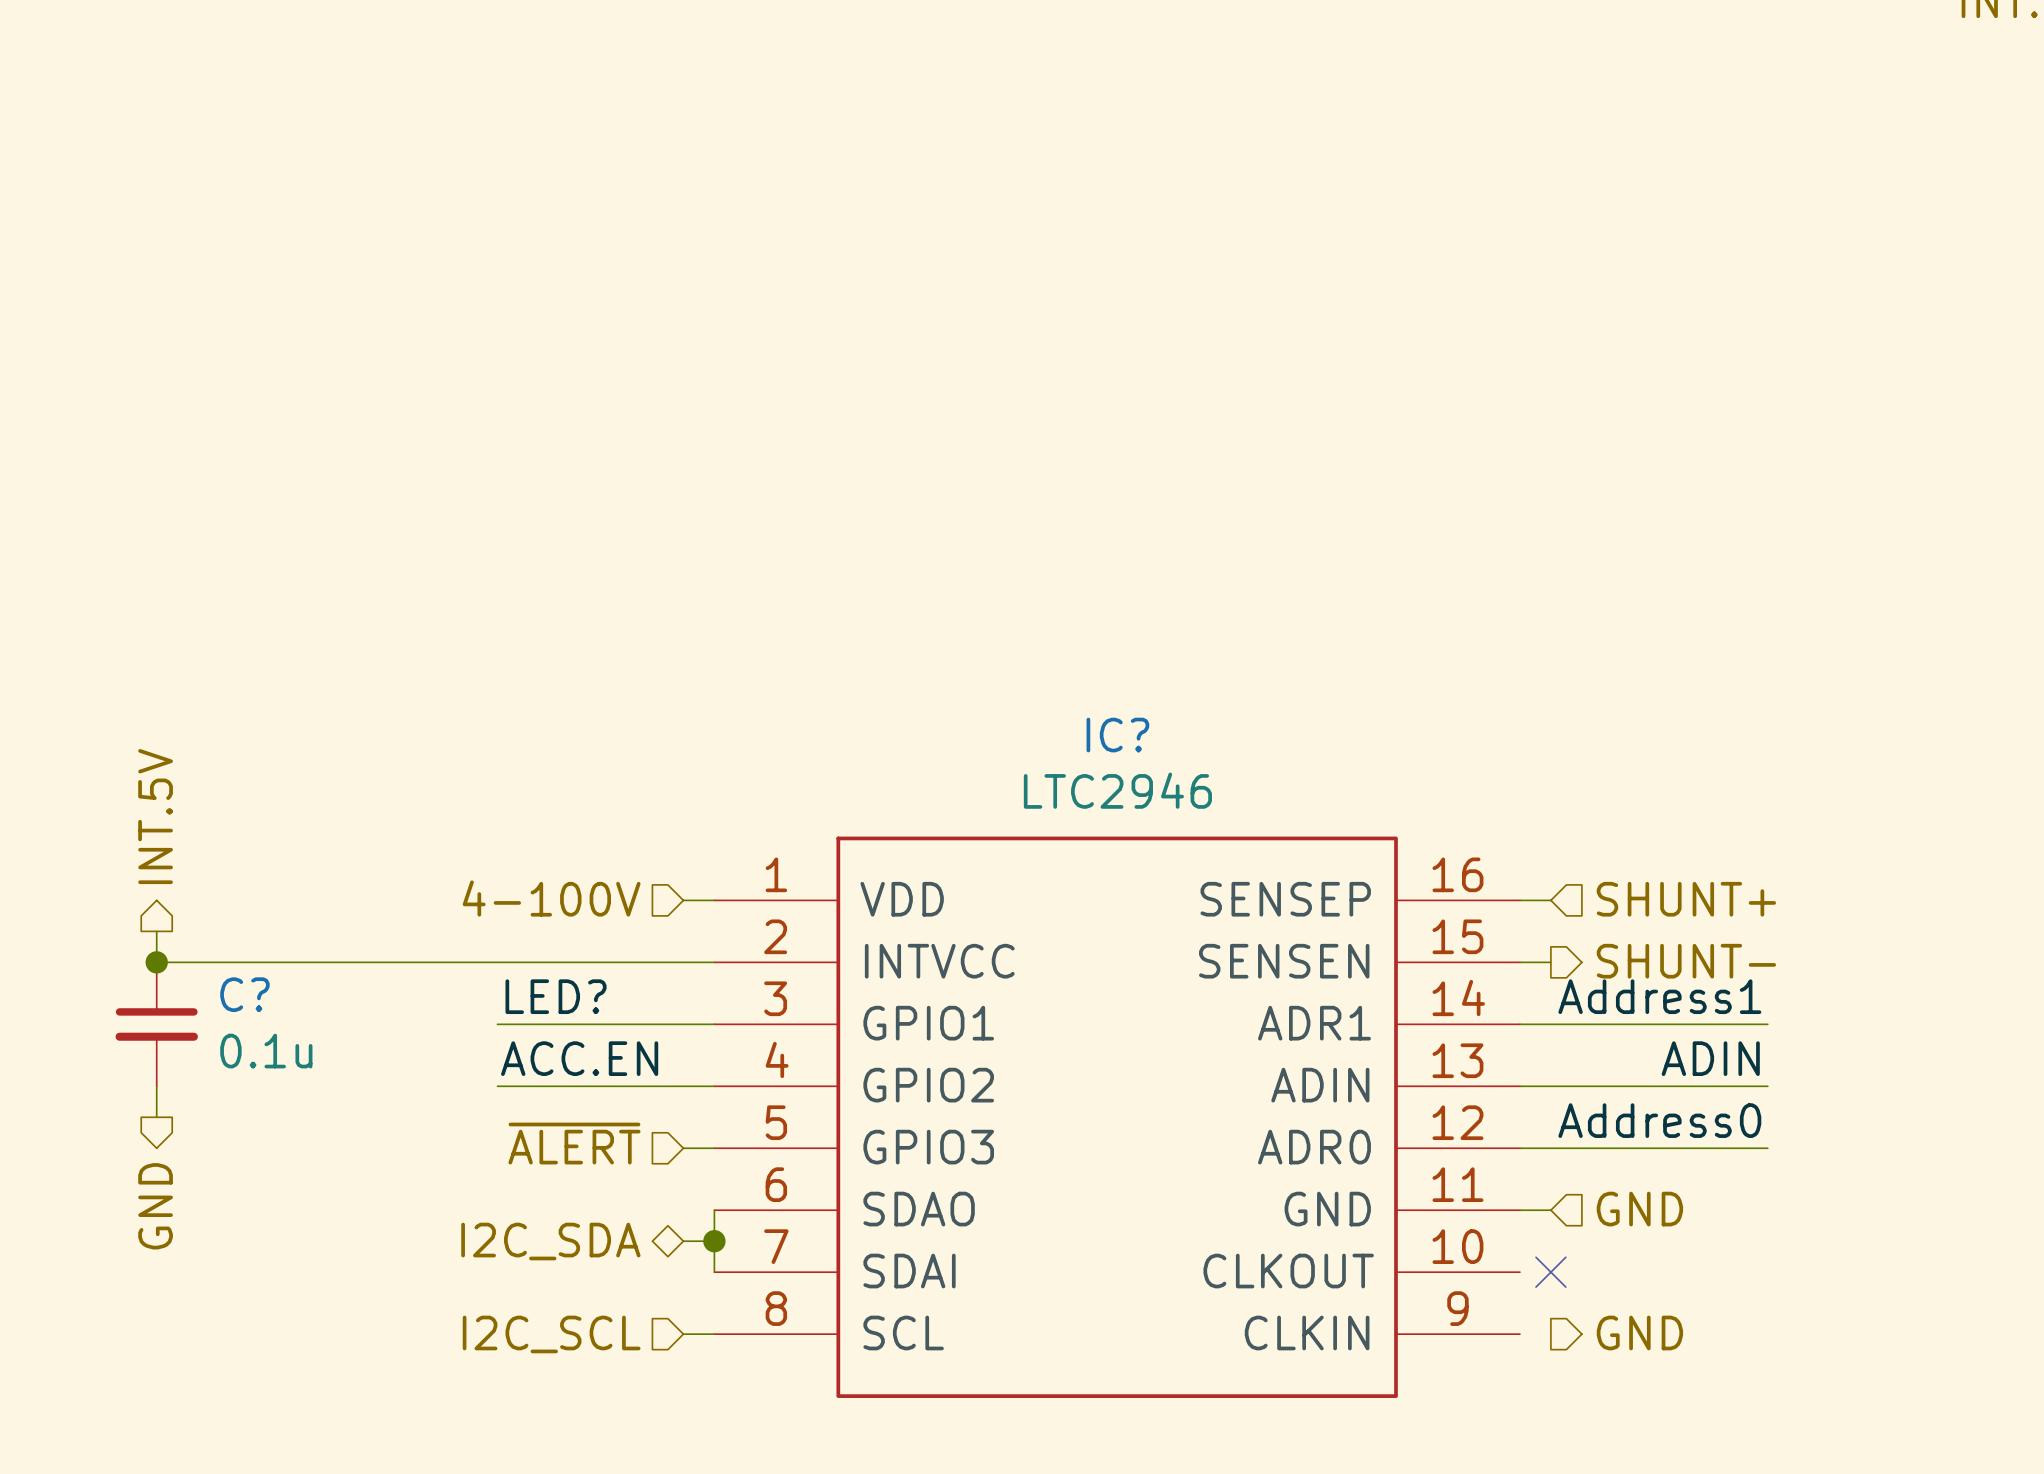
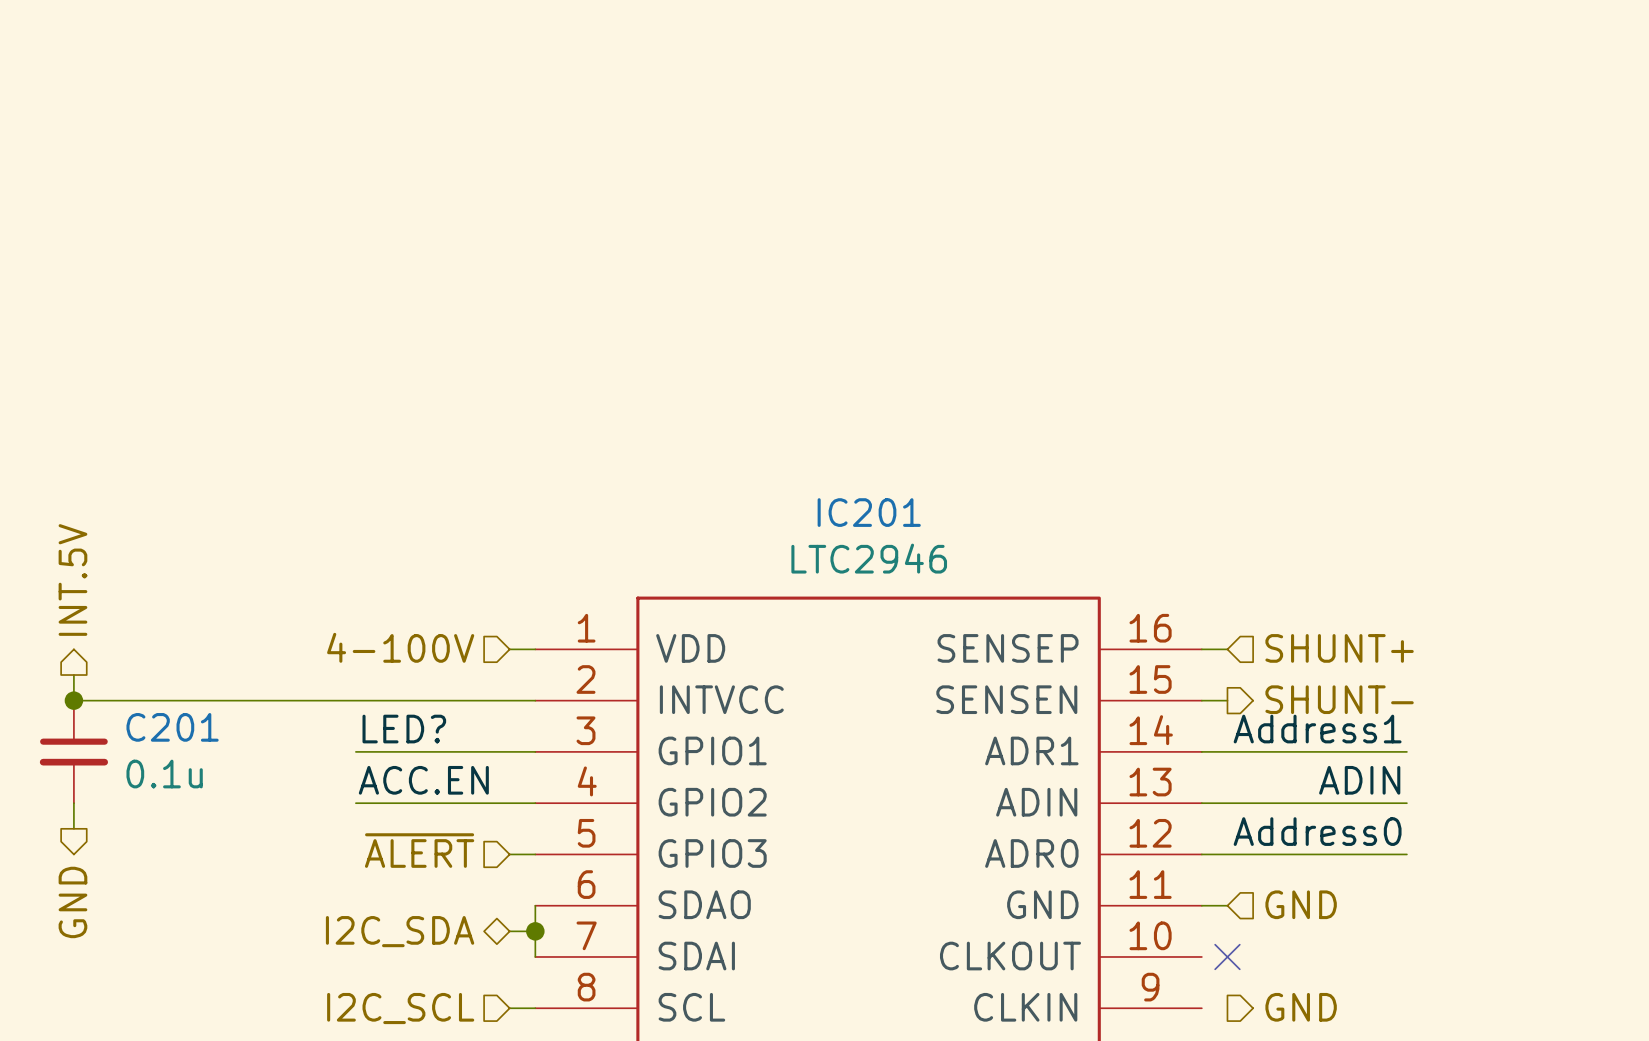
IC? name: IC? (1117, 735) -> IC201 (869, 512)
C? name: C? (244, 994) -> C201 (172, 727)

